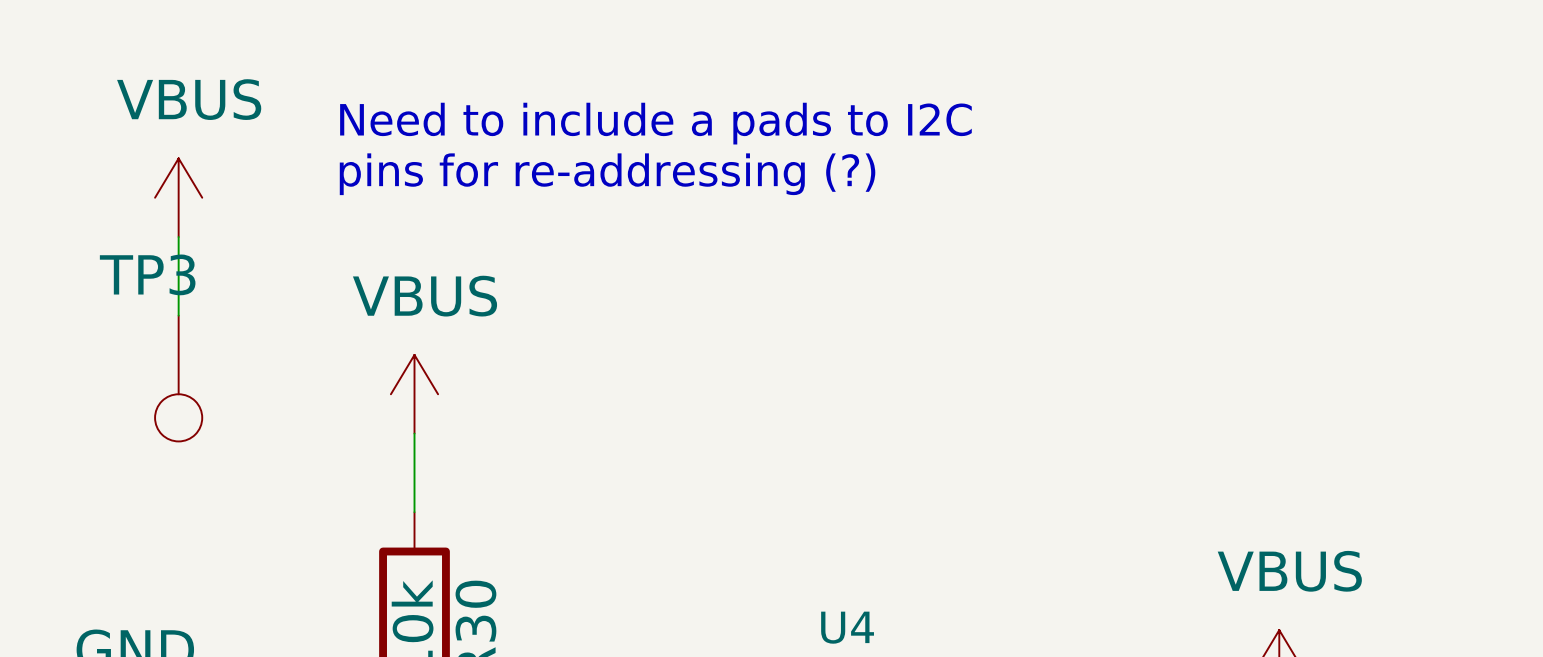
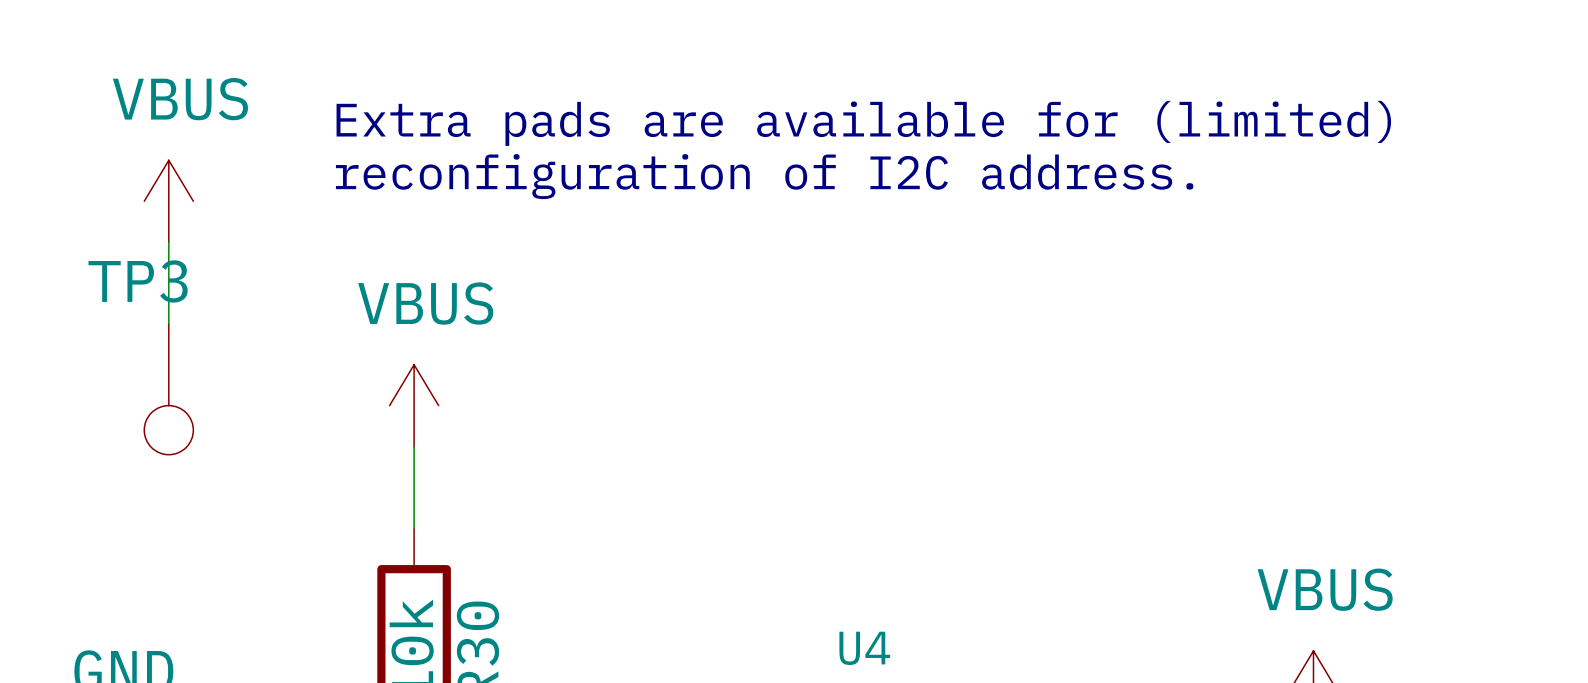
text: Need to include a pads to I2C (655, 123) -> Extra pads are available for (limited) (863, 123)
text: pins for re-addressing (?) (607, 174) -> reconfiguration of I2C address. (764, 176)

